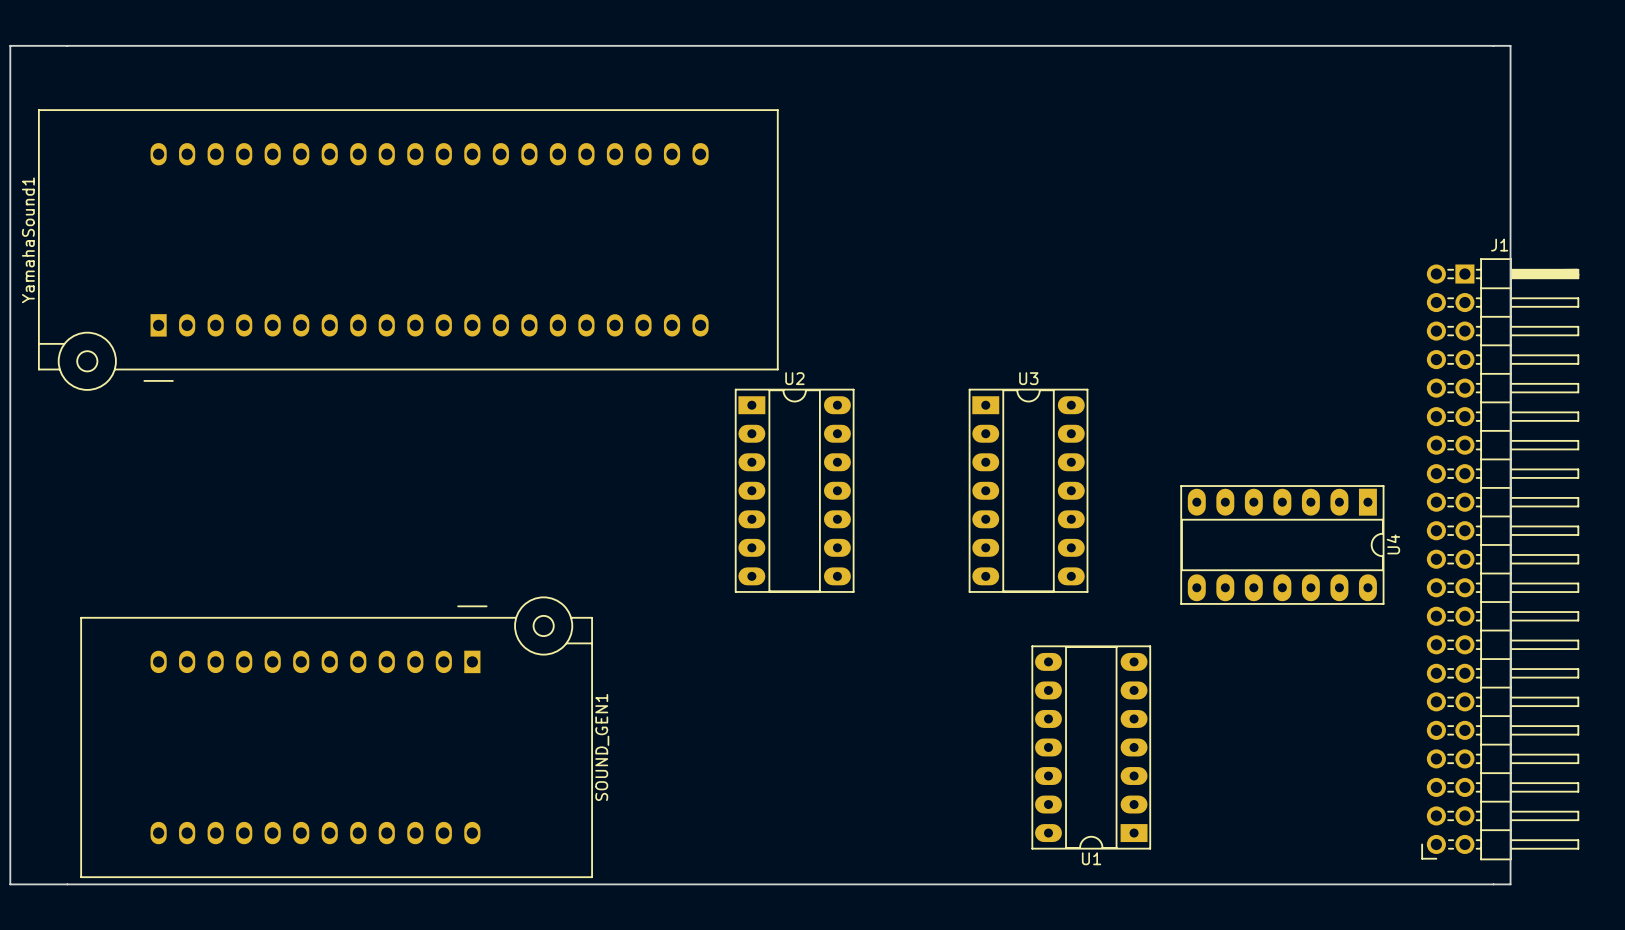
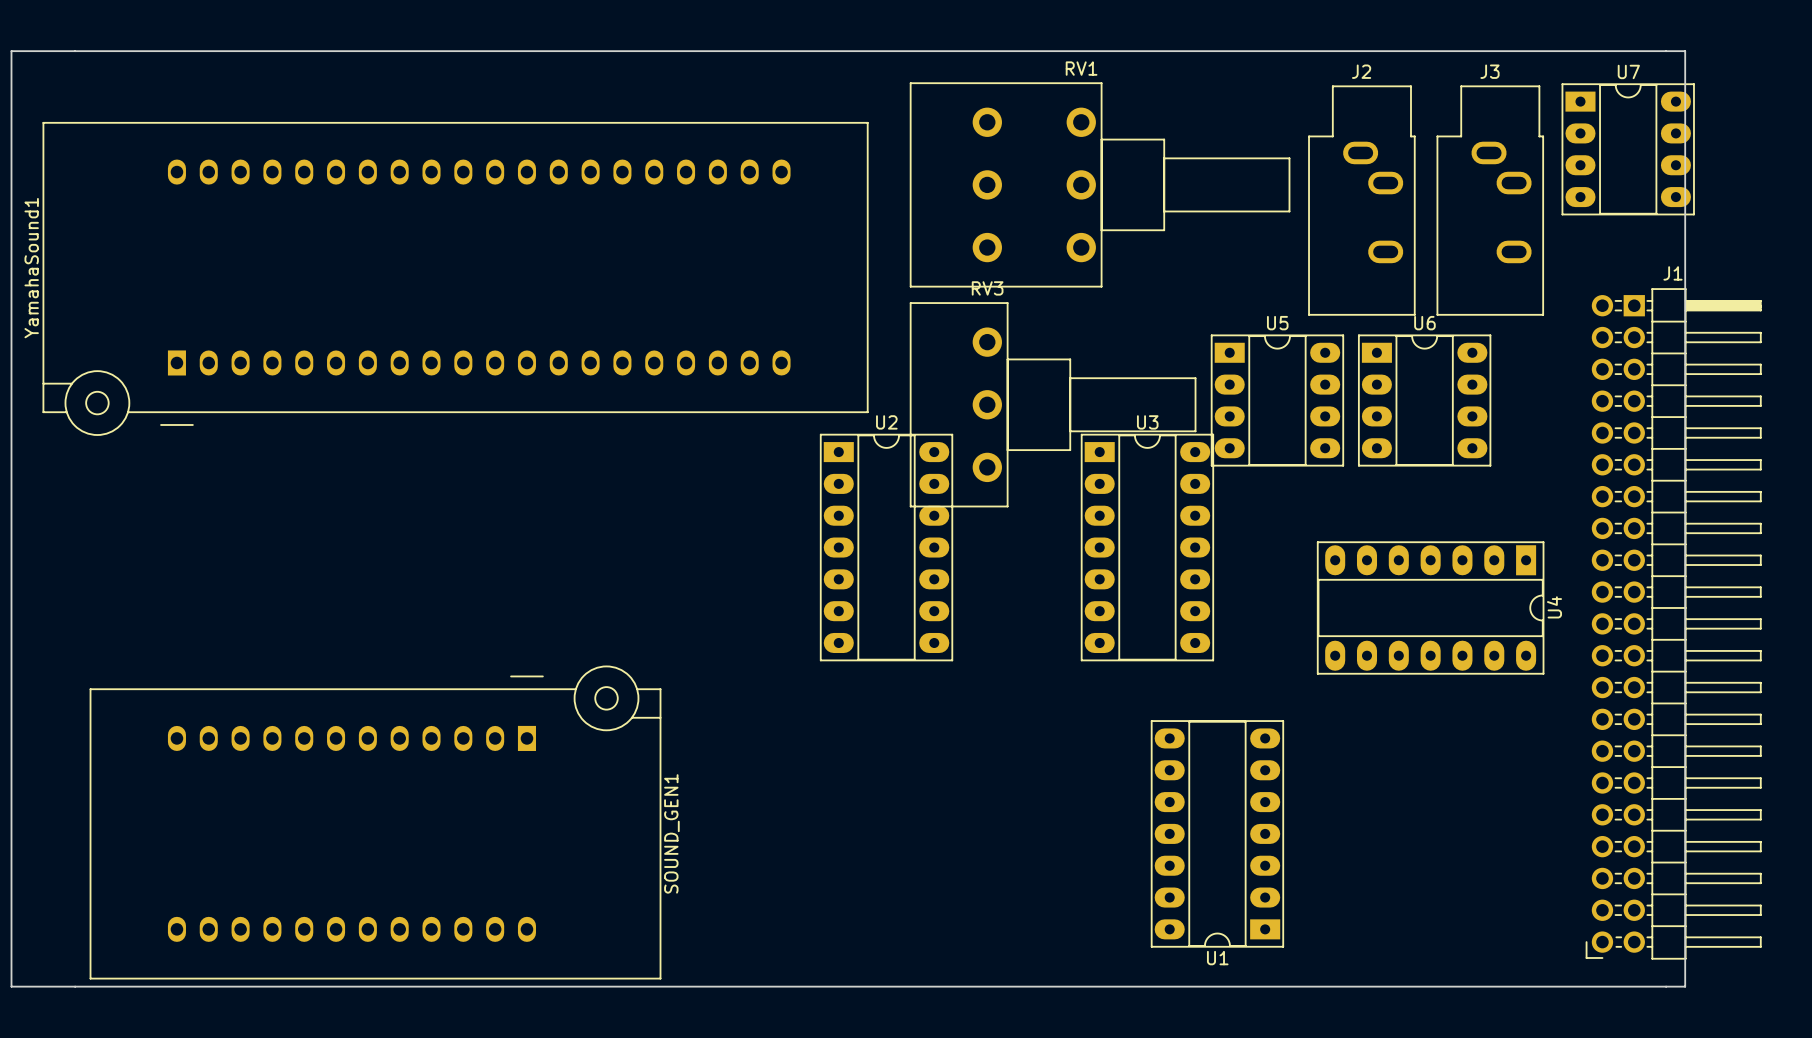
U7: none -> (1628, 149)
RV1: none -> (1100, 184)
J2: none -> (1361, 200)
J3: none -> (1490, 200)
U5: none -> (1277, 400)
U6: none -> (1424, 400)
RV3: none -> (1053, 404)

